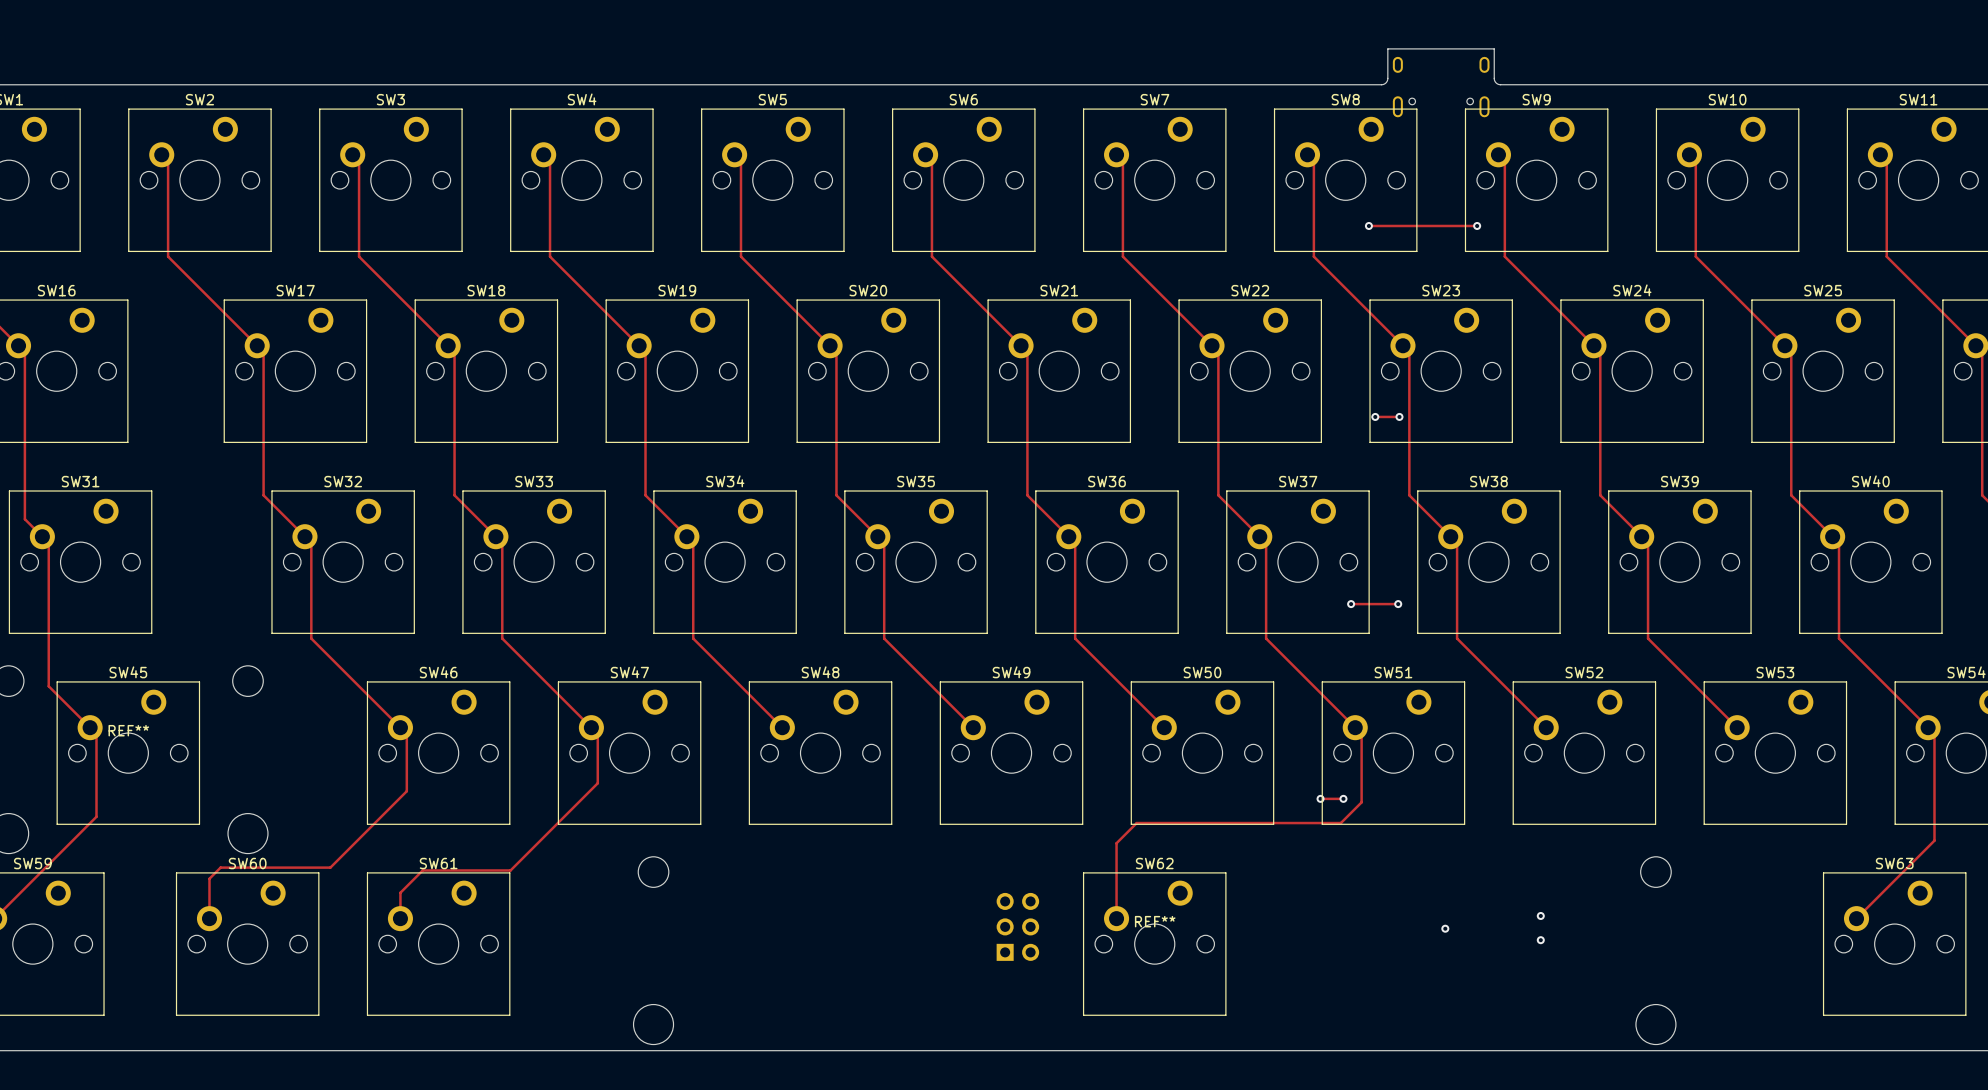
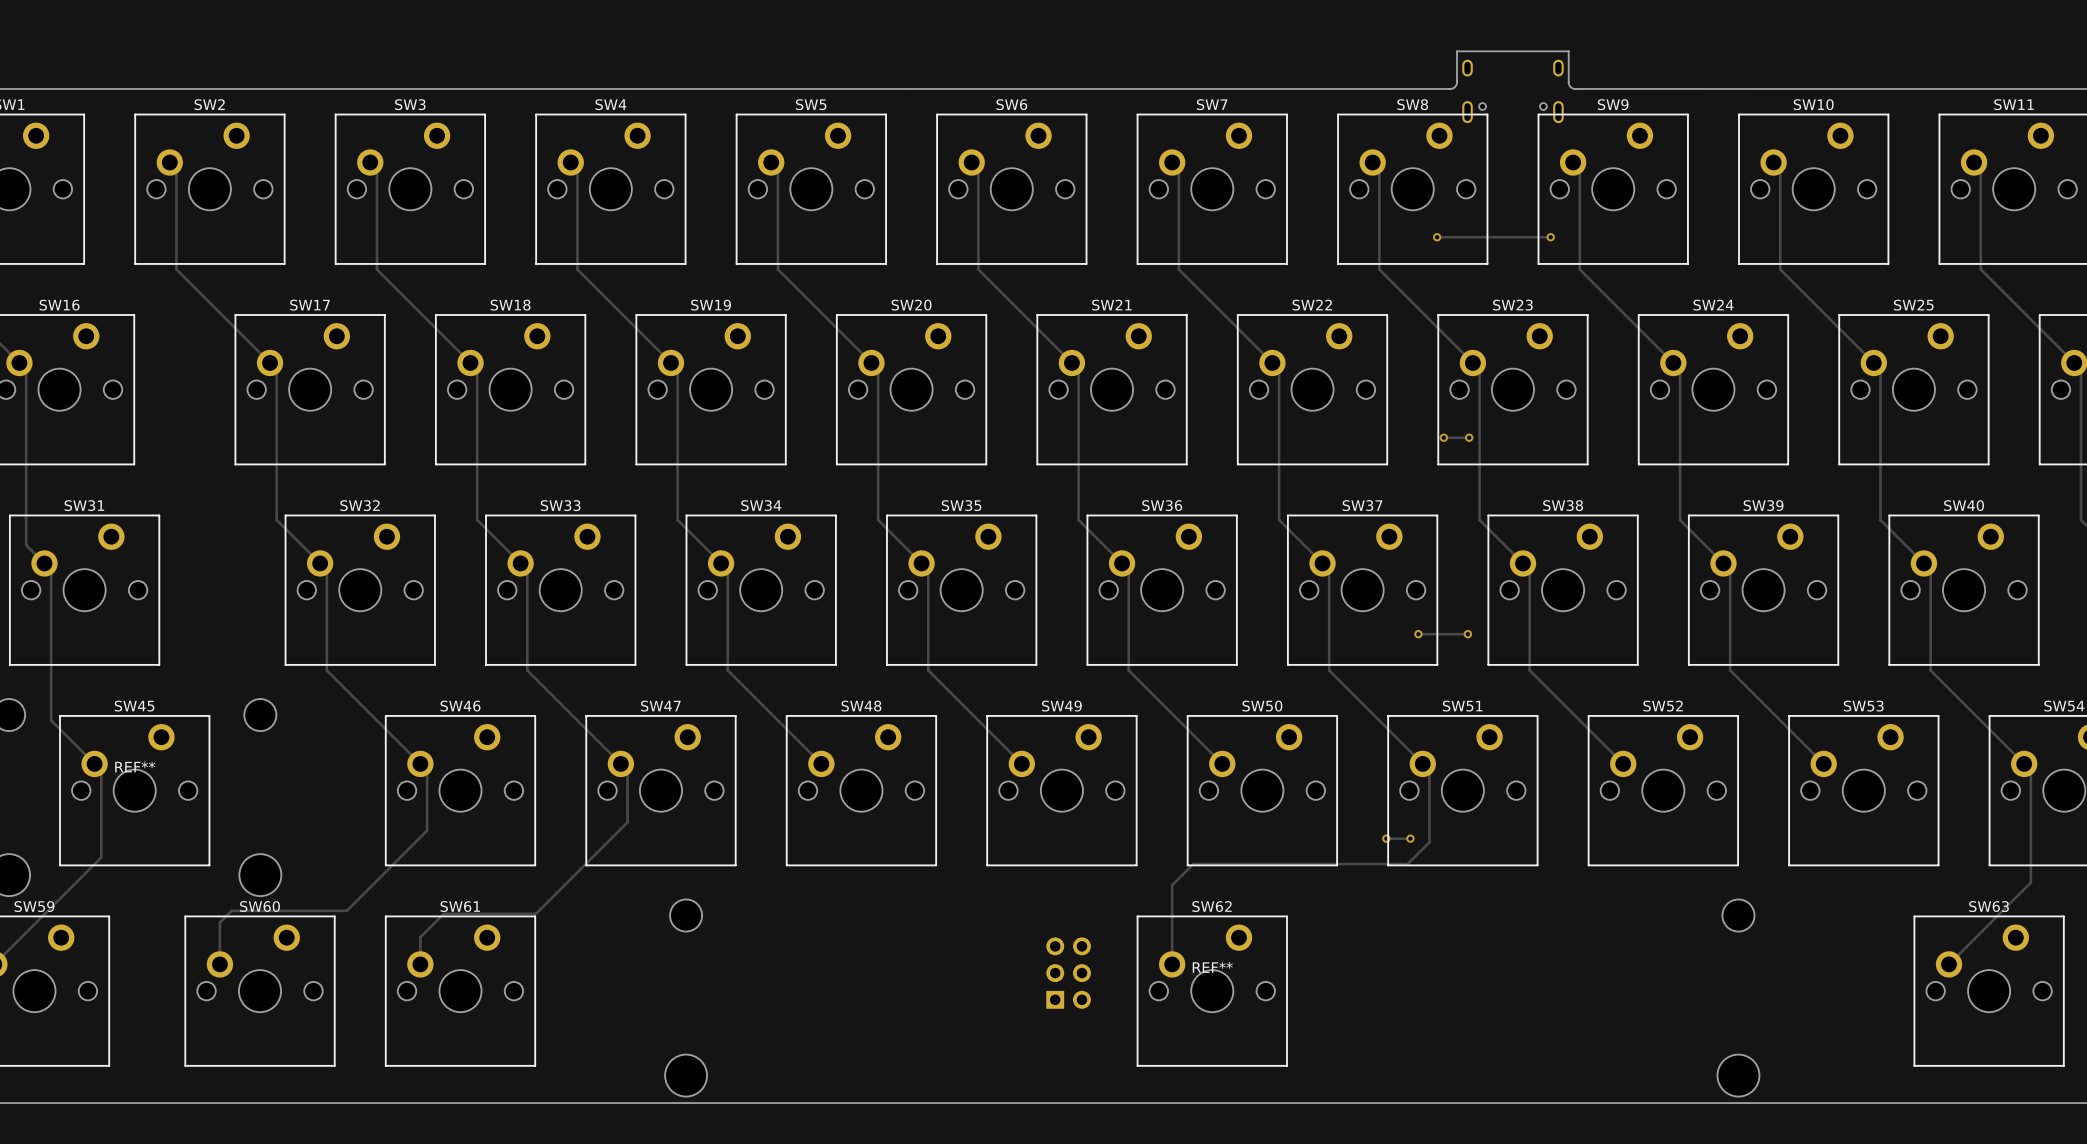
via: (1540, 915) -> none
via: (1445, 928) -> none
via: (1540, 940) -> none

